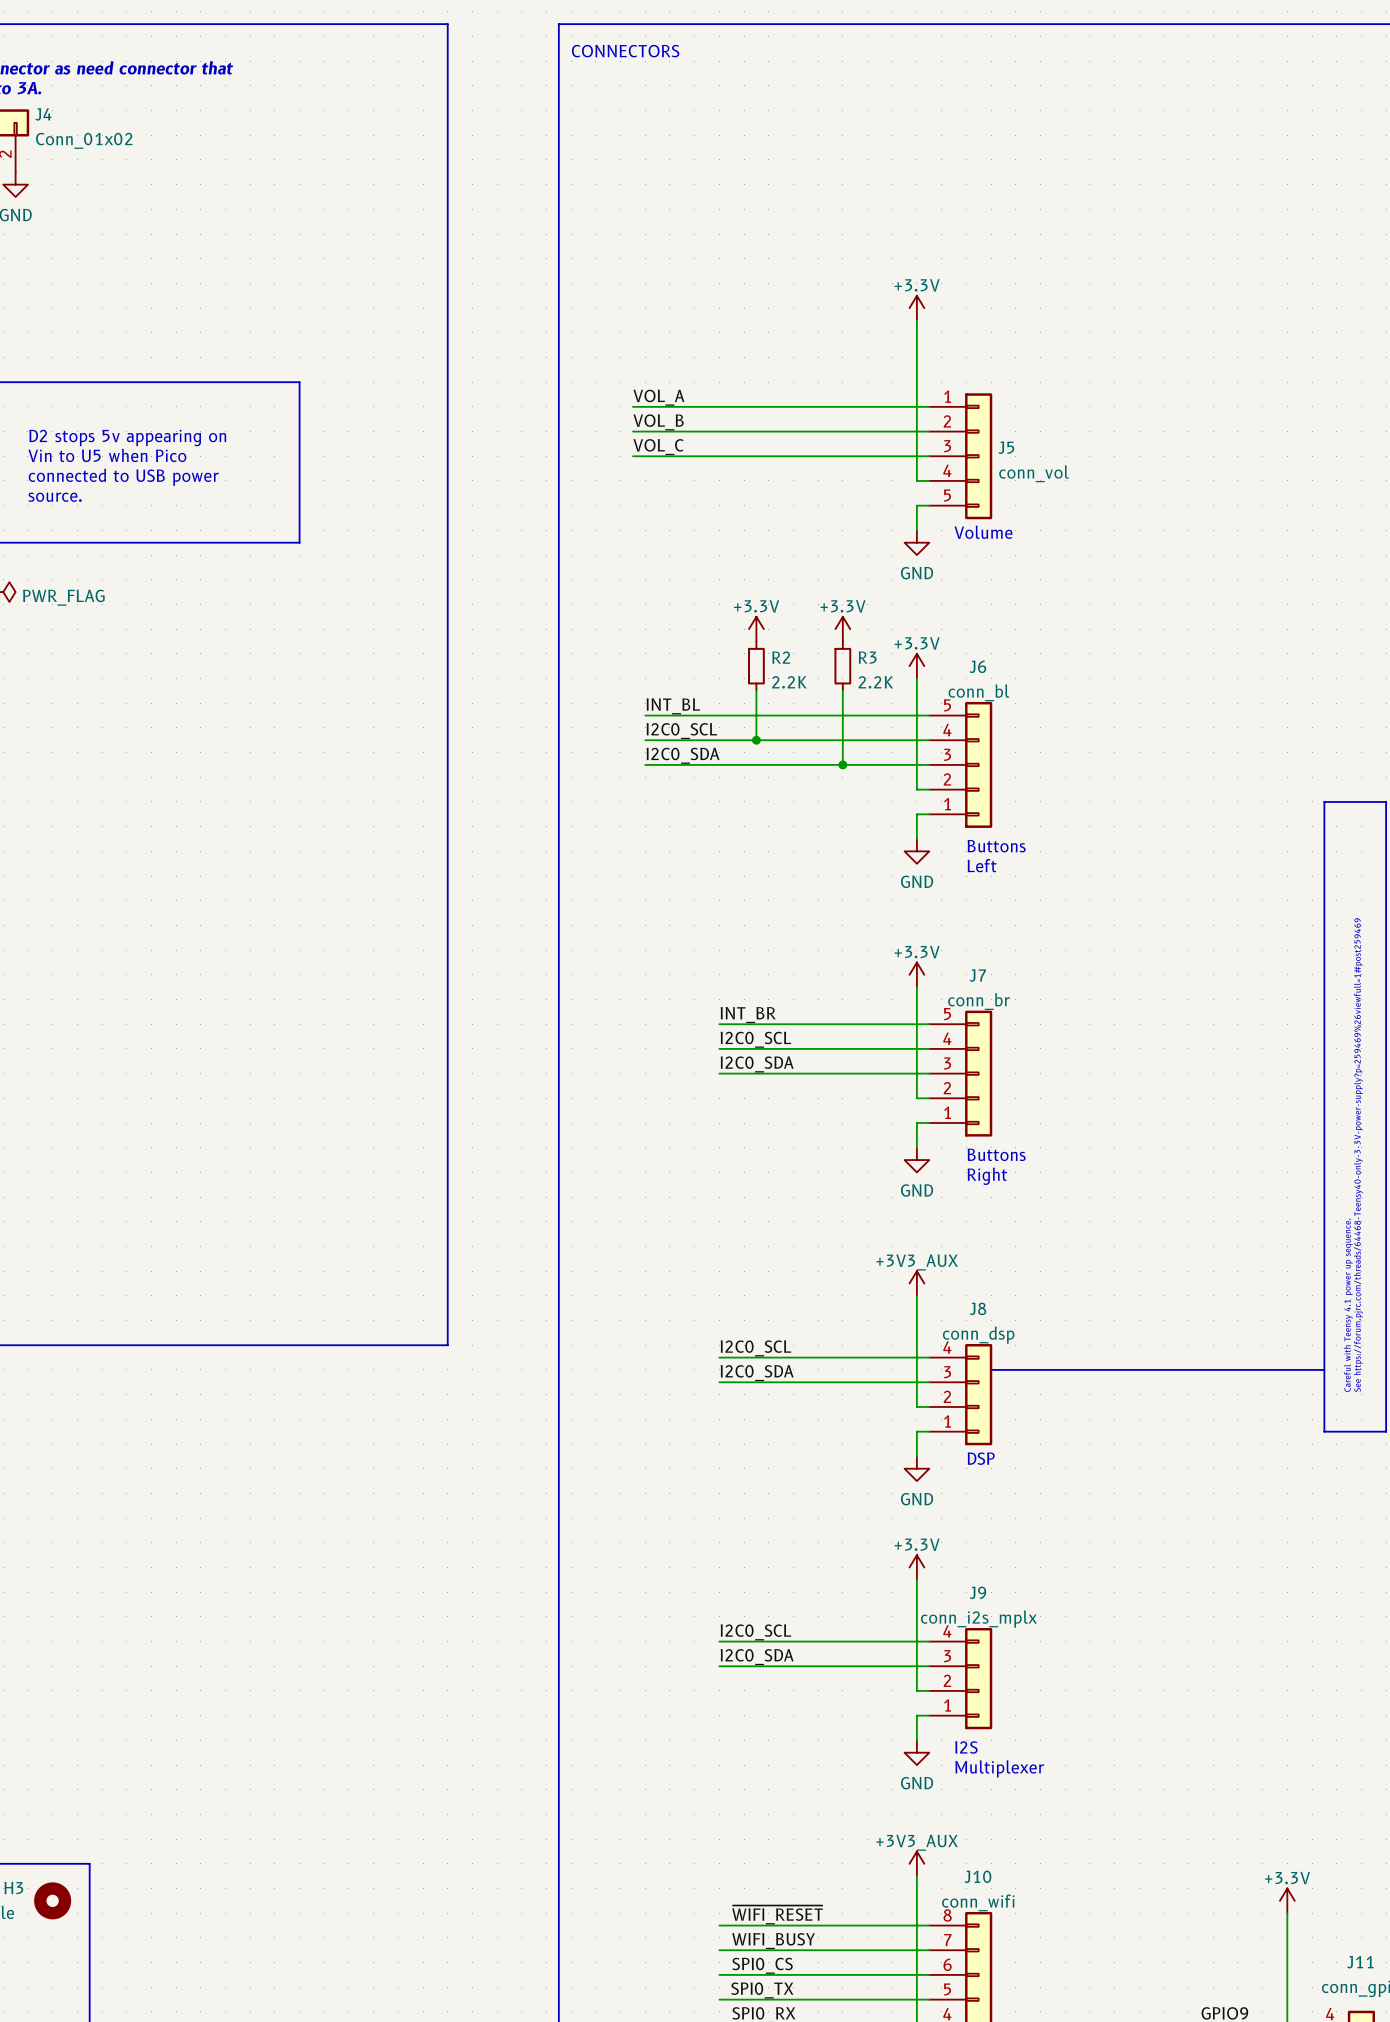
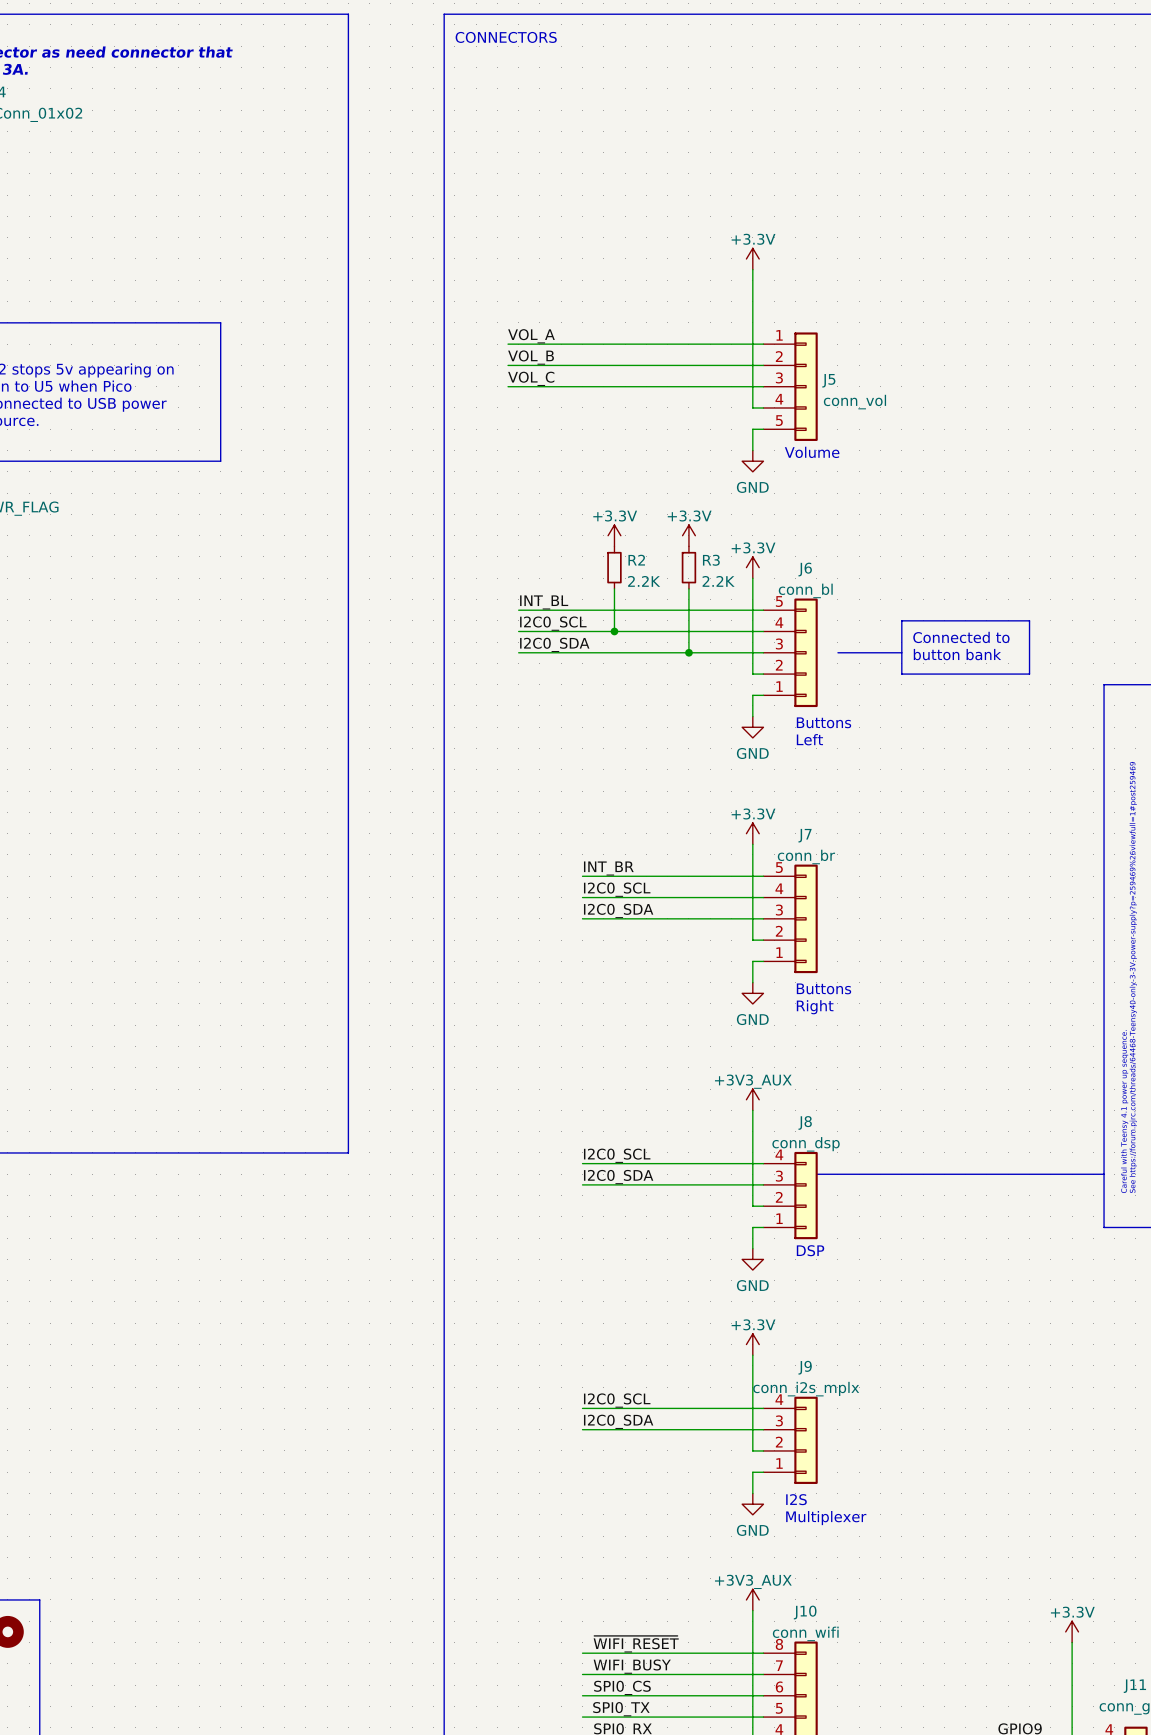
line: none -> (901, 620) (1029, 620) (1029, 674) (901, 674) (901, 620)
text: none -> Connected to (961, 637)
line: none -> (837, 652) (901, 652)
text: none -> button bank (957, 654)

